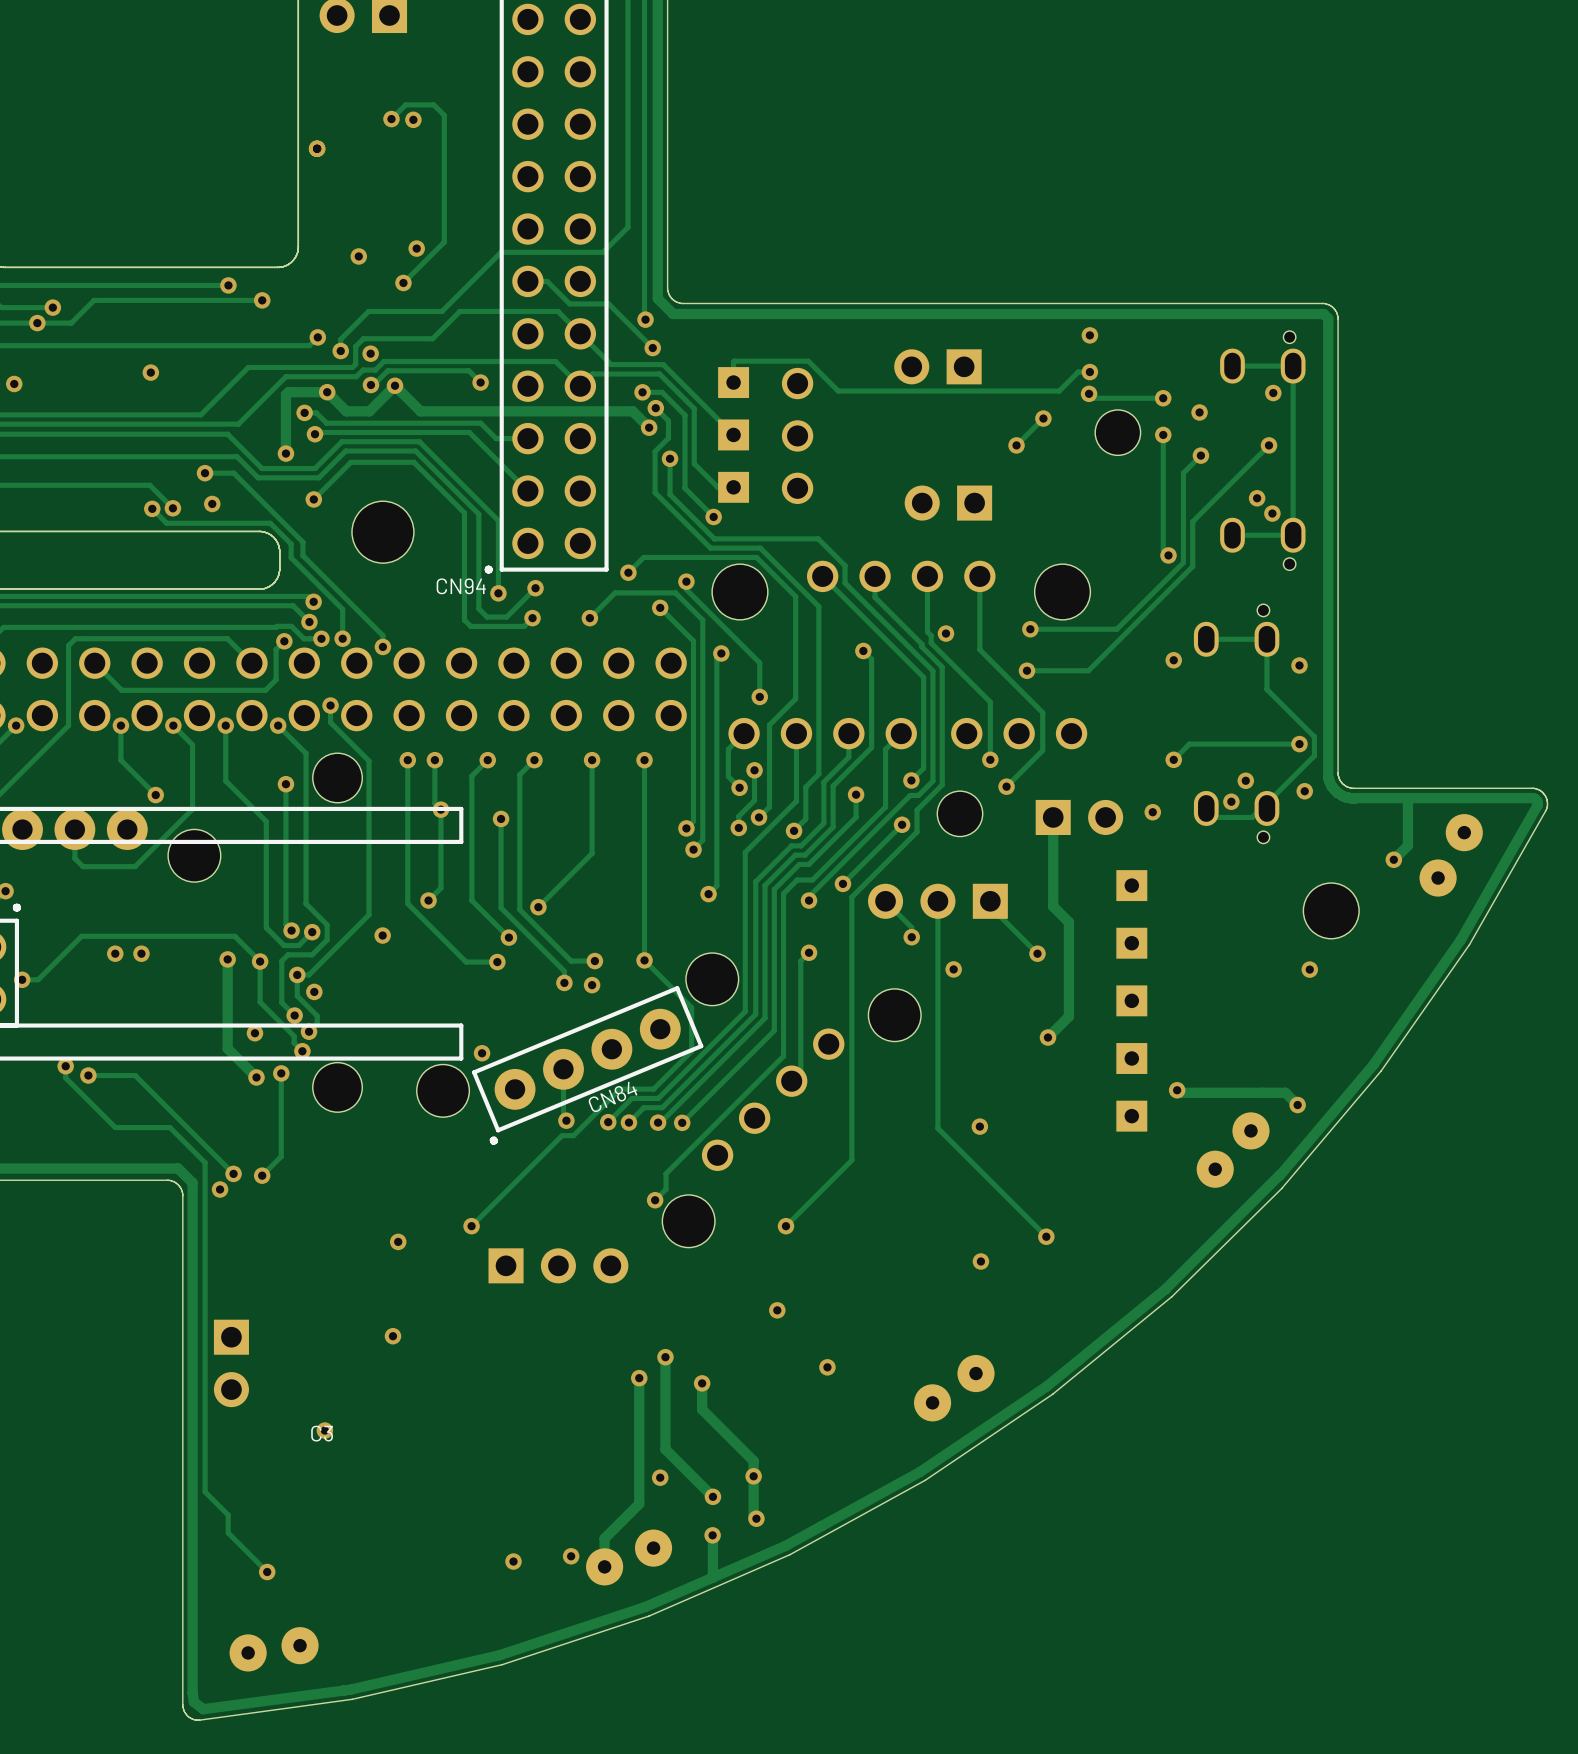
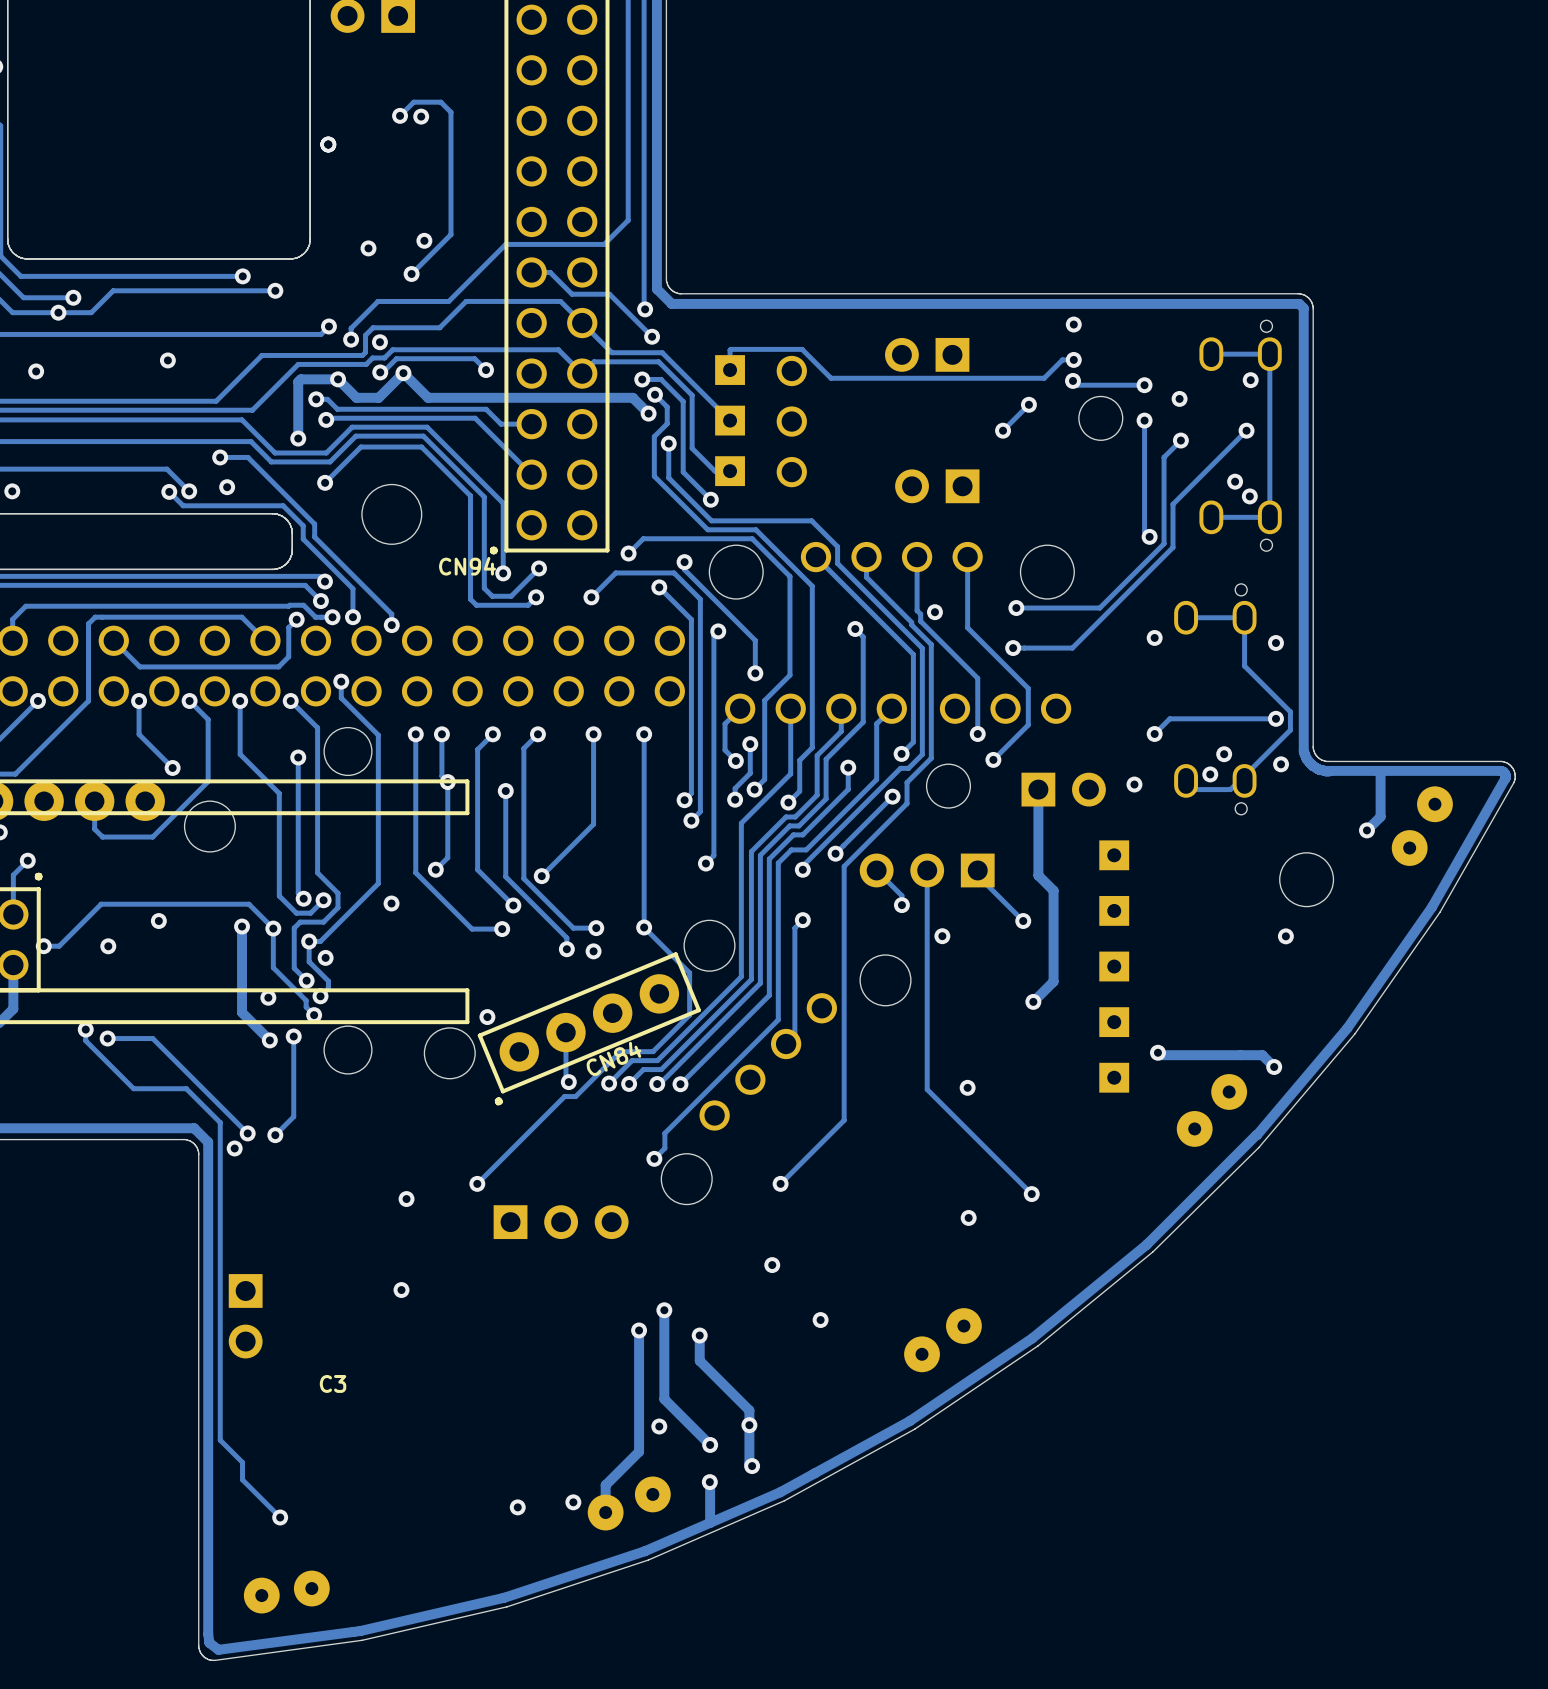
via position: (115, 953) -> (108, 946)
via: (324, 1430) -> none

